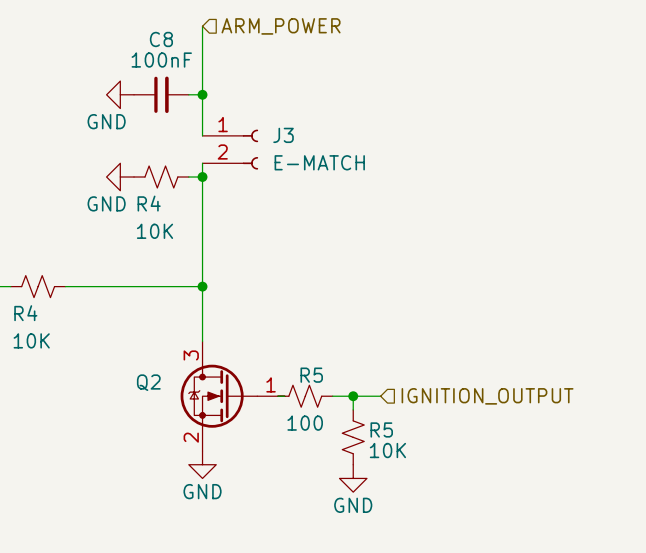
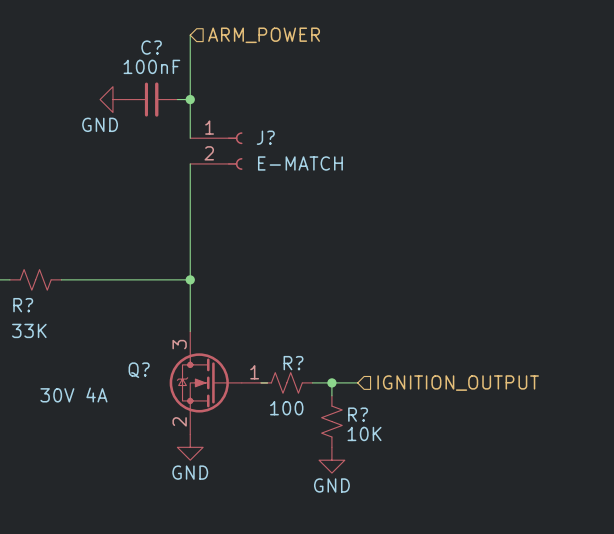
C8 name: C8 (161, 39) -> C? (151, 47)
J3 name: J3 (283, 135) -> J? (265, 137)
power symbol: GND (120, 177) -> none
R4: 10K (161, 177) -> none
wire: (188, 177) (202, 177) -> none
junction: (202, 177) -> none
R4 name: R4 (25, 313) -> R? (23, 305)
R4 value: 10K (31, 340) -> 33K (29, 330)
R5 name: R5 (311, 375) -> R? (293, 363)
Q2 name: Q2 (148, 382) -> Q? (139, 370)
Q2 value: none -> 30V 4A (73, 395)
R5 name: R5 (381, 429) -> R? (358, 414)

